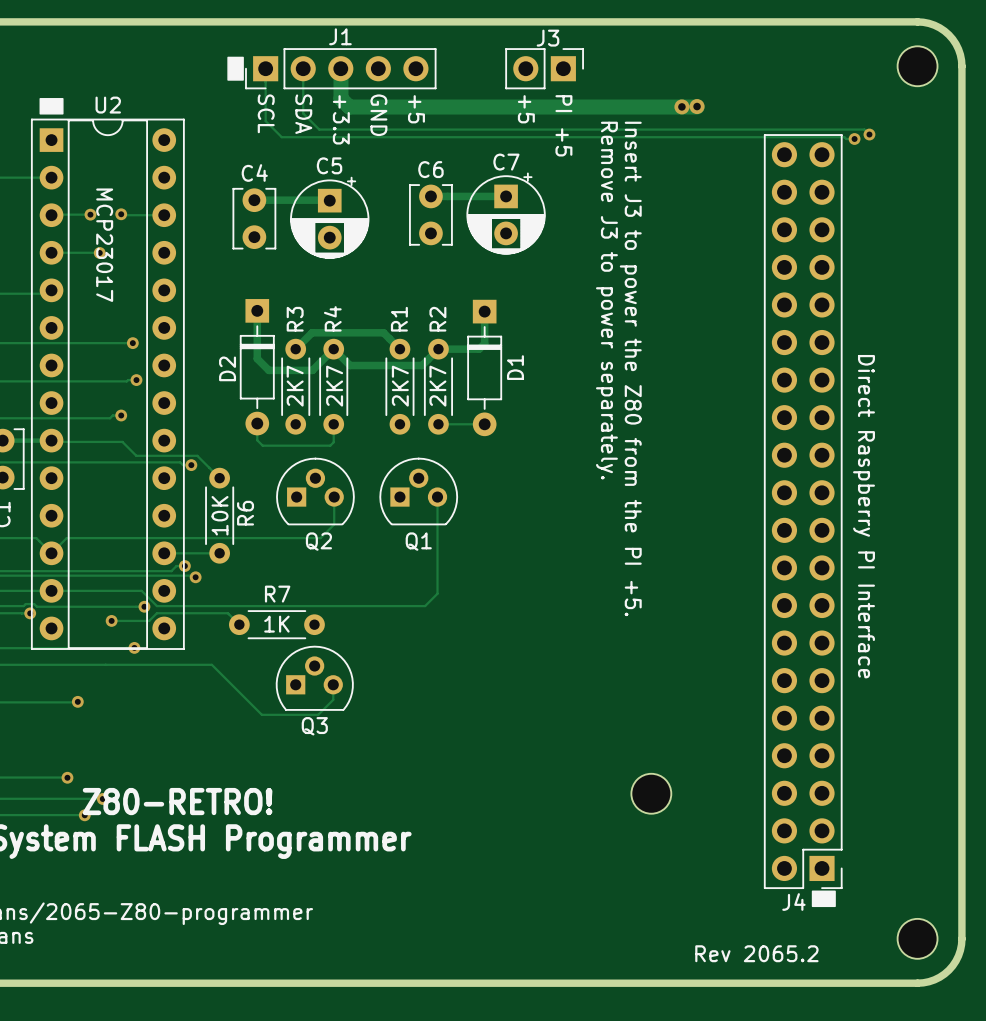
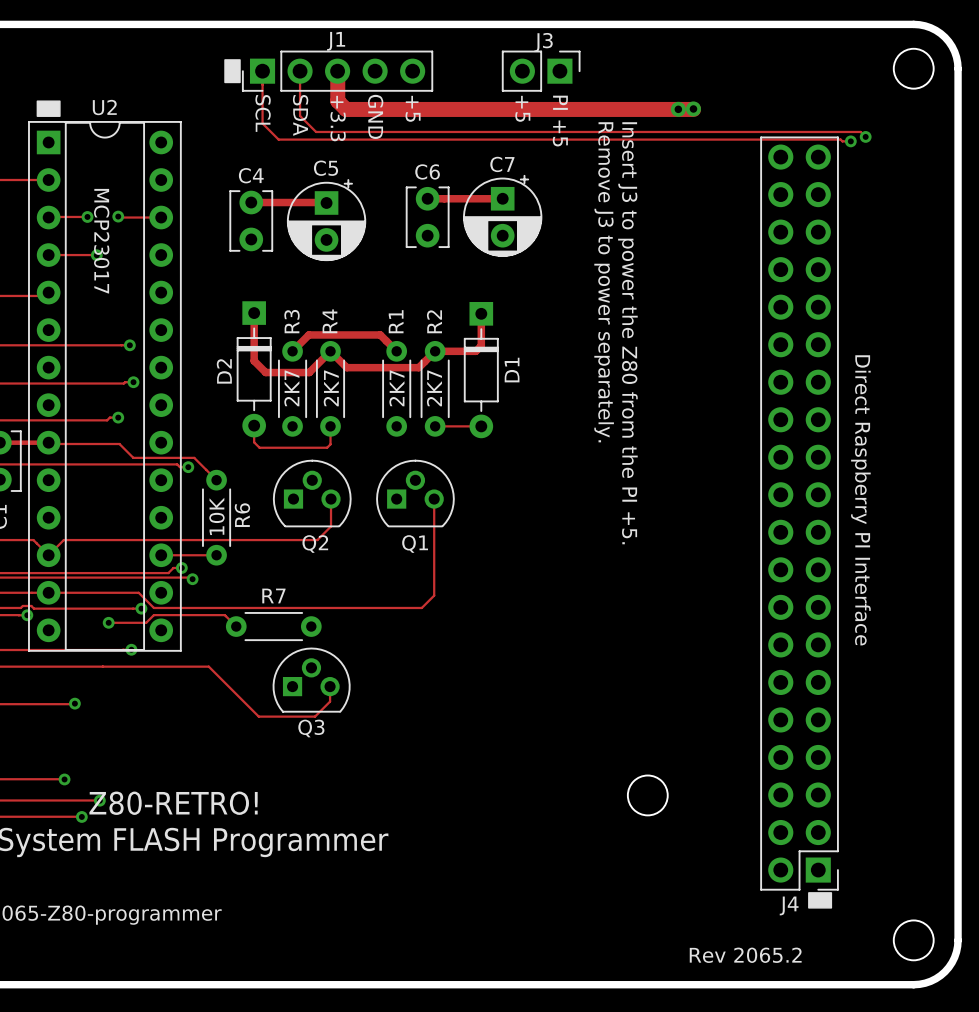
text: 1K (276, 624) -> none

